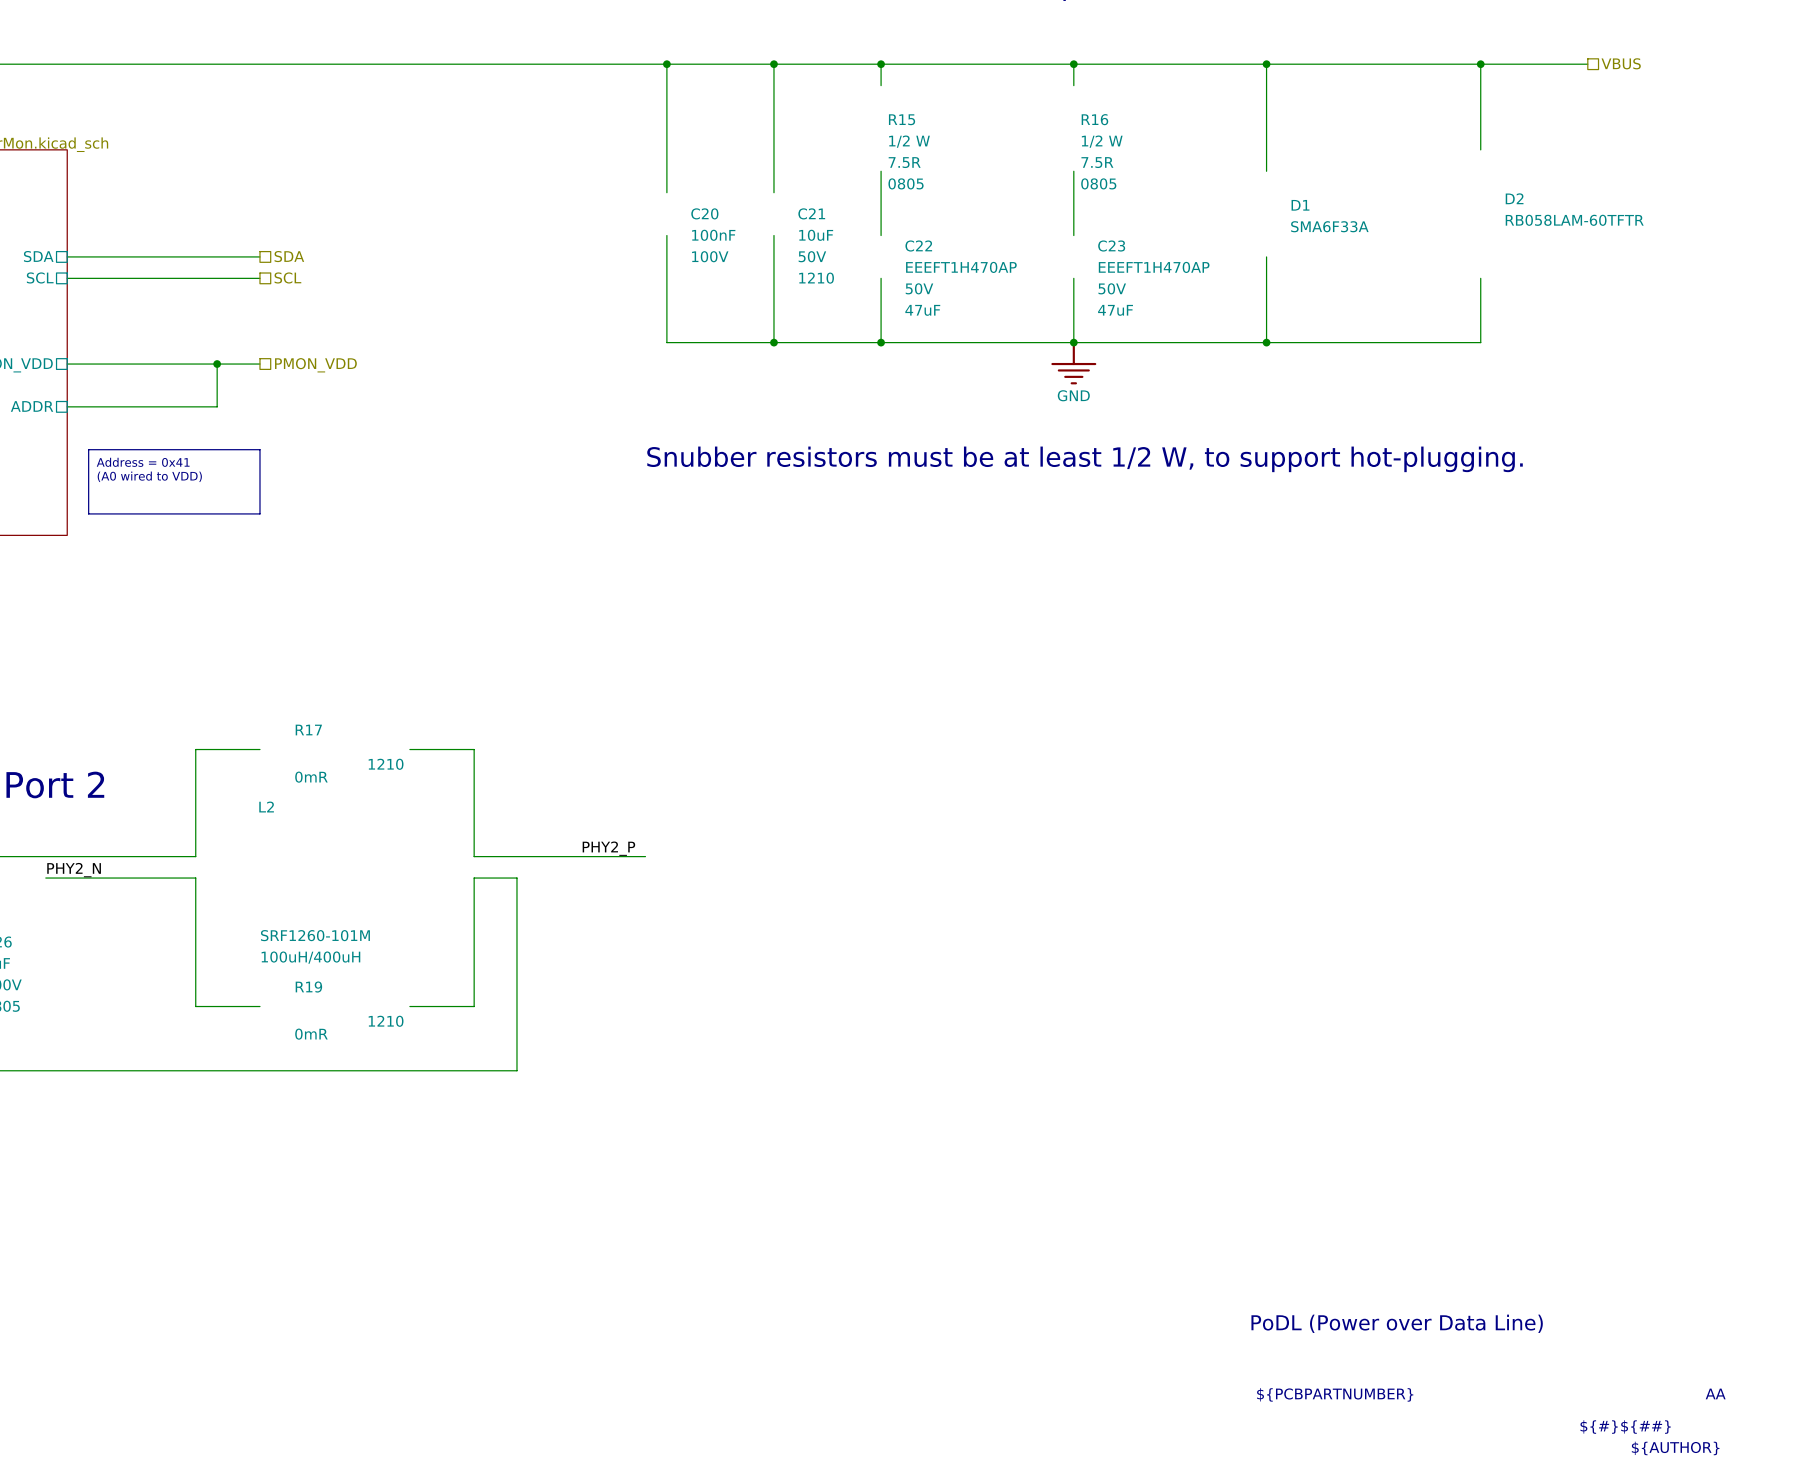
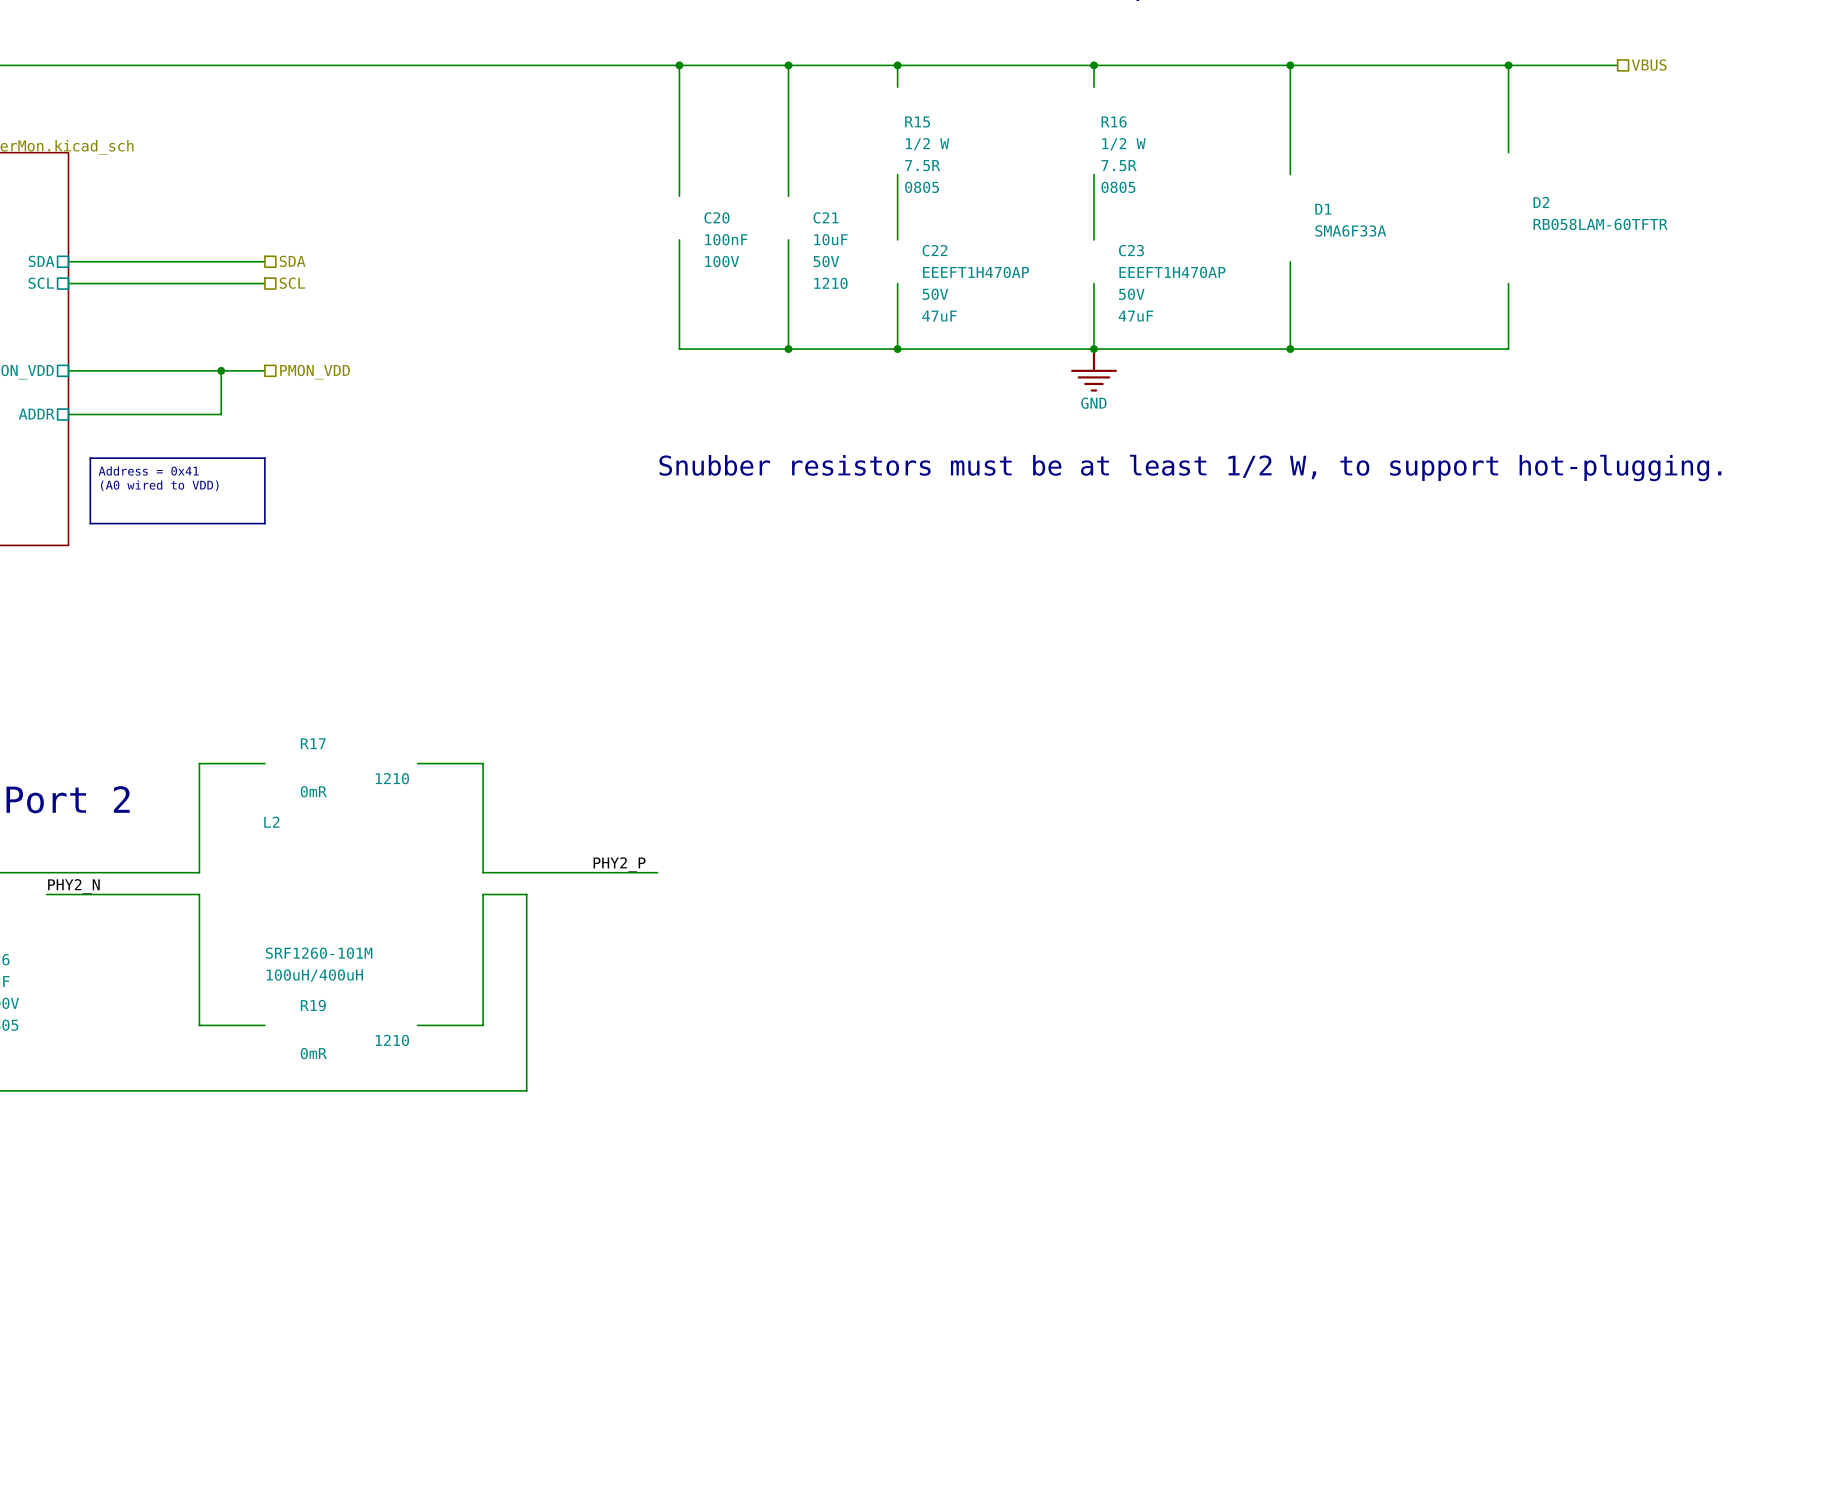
text: PoDL (Power over Data Line) (1397, 1323) -> none
text: AA (1715, 1393) -> none
text: ${PCBPARTNUMBER} (1335, 1394) -> none
text: ${#} (1599, 1427) -> none
text: ${##} (1645, 1427) -> none
text: ${AUTHOR} (1675, 1448) -> none

